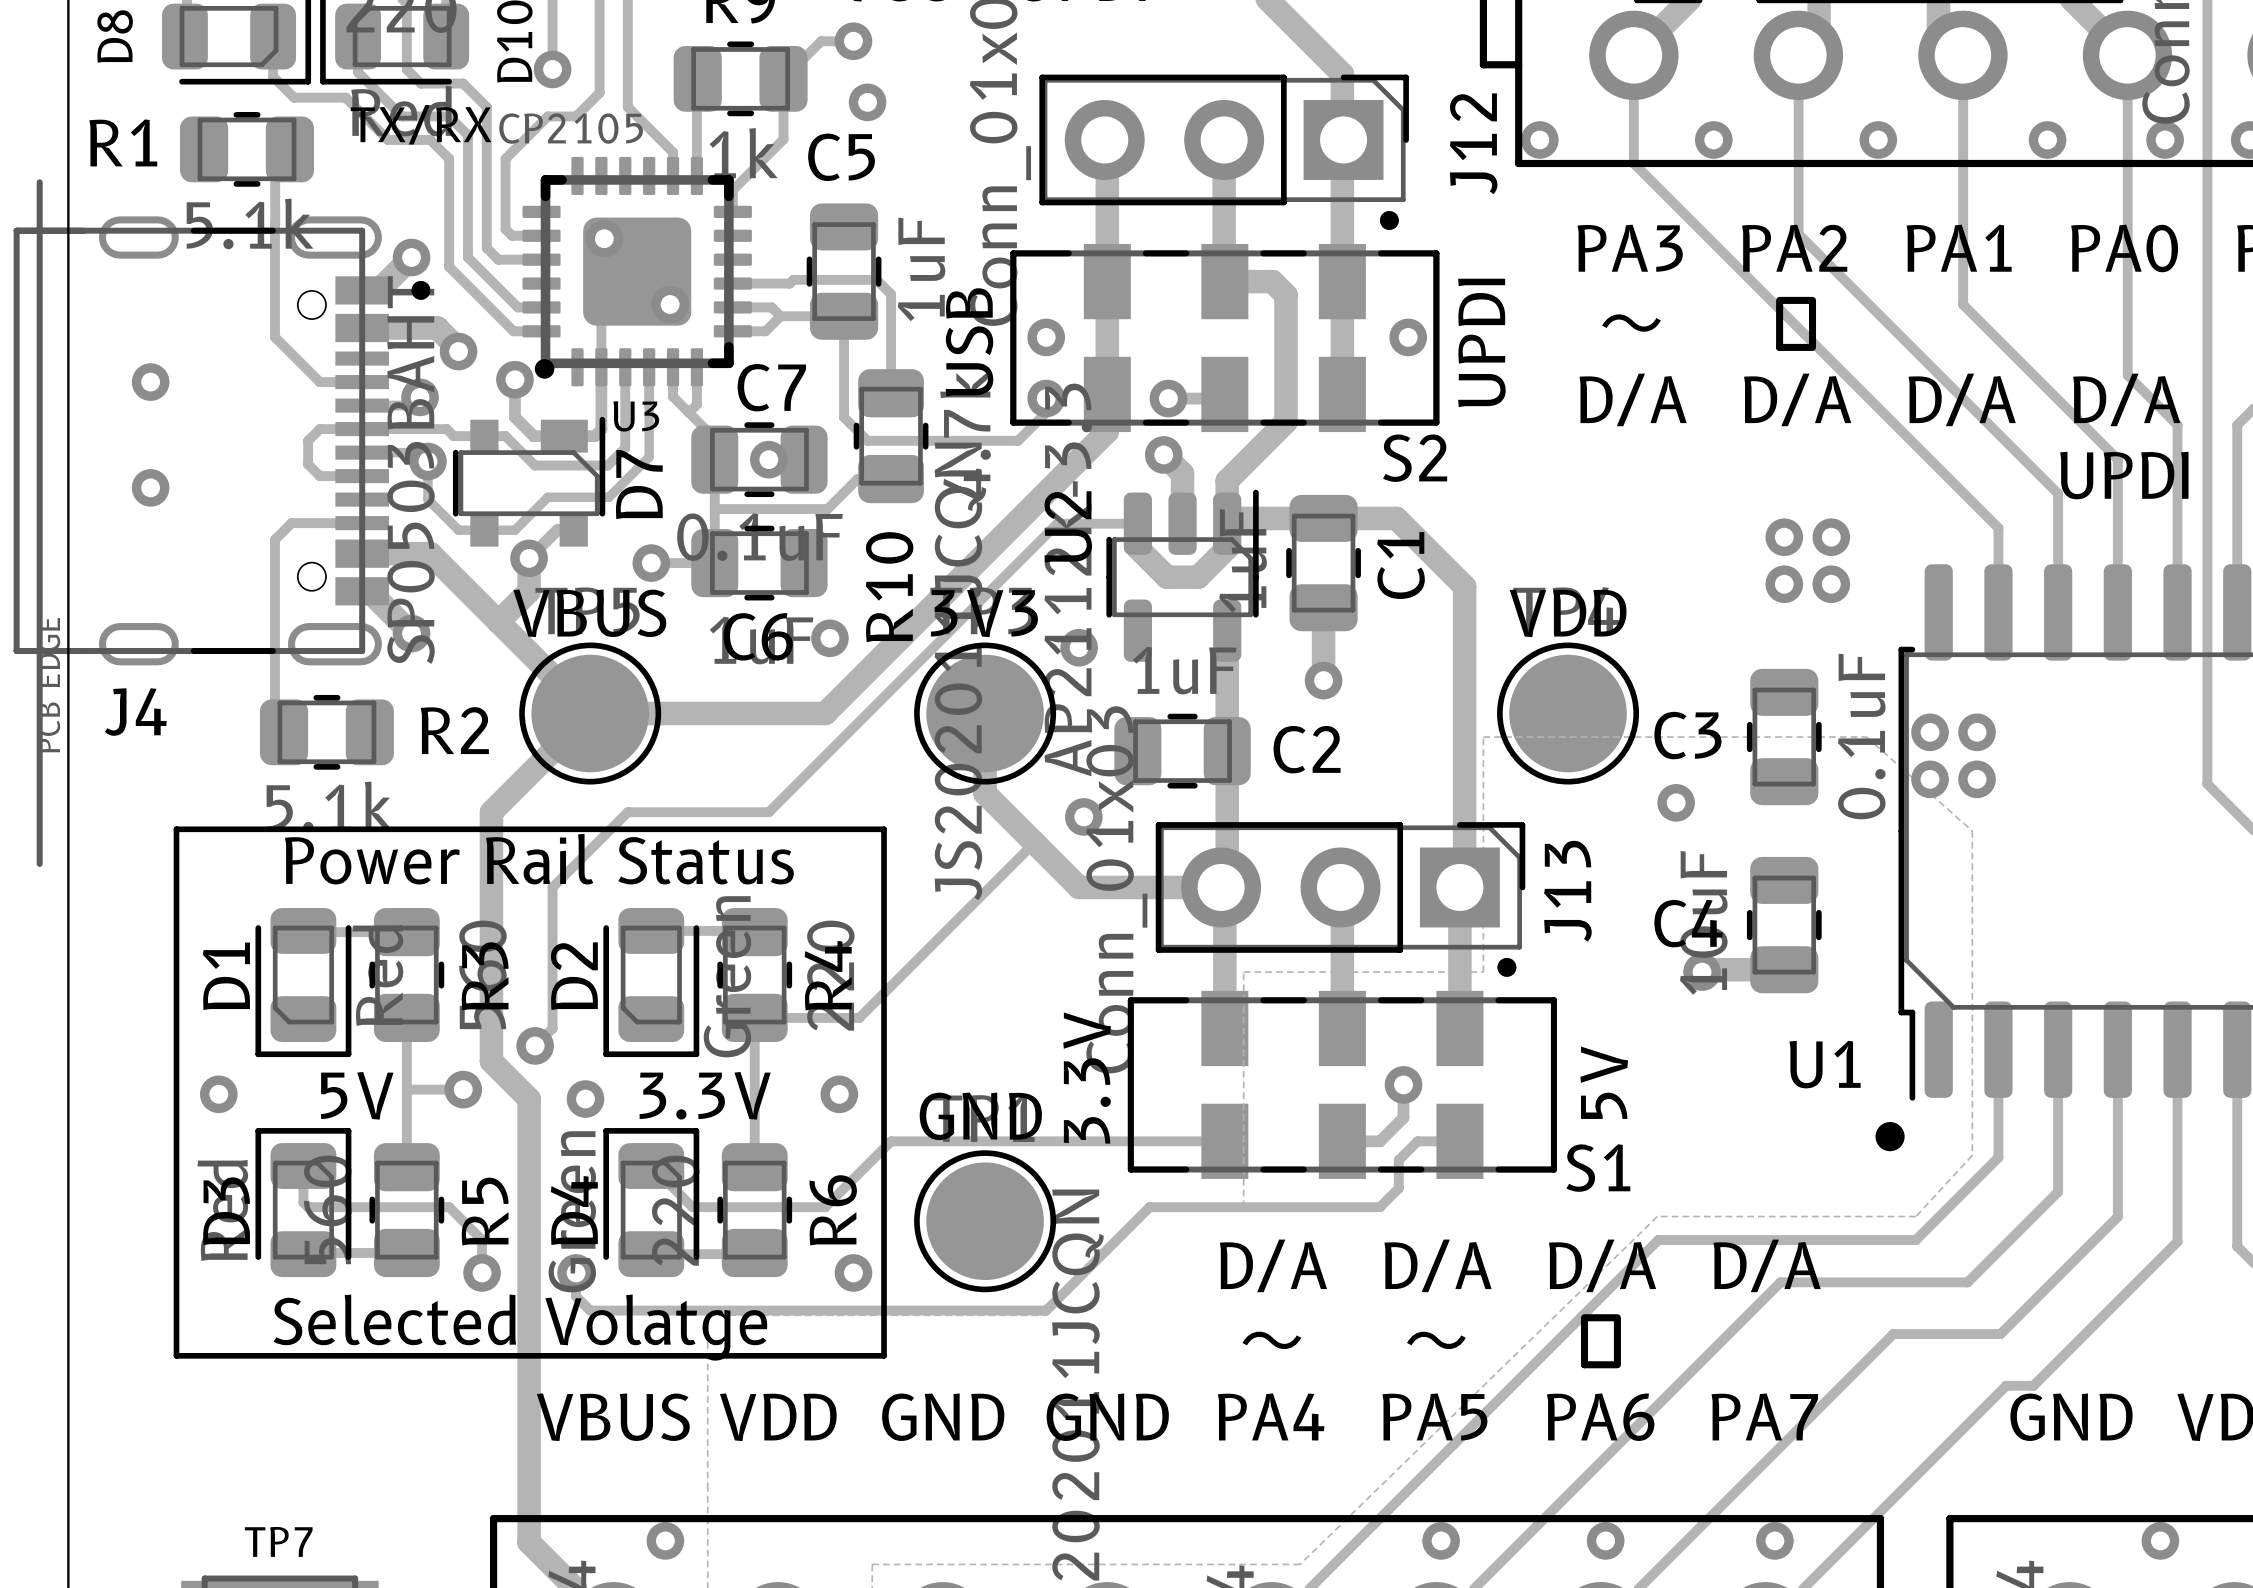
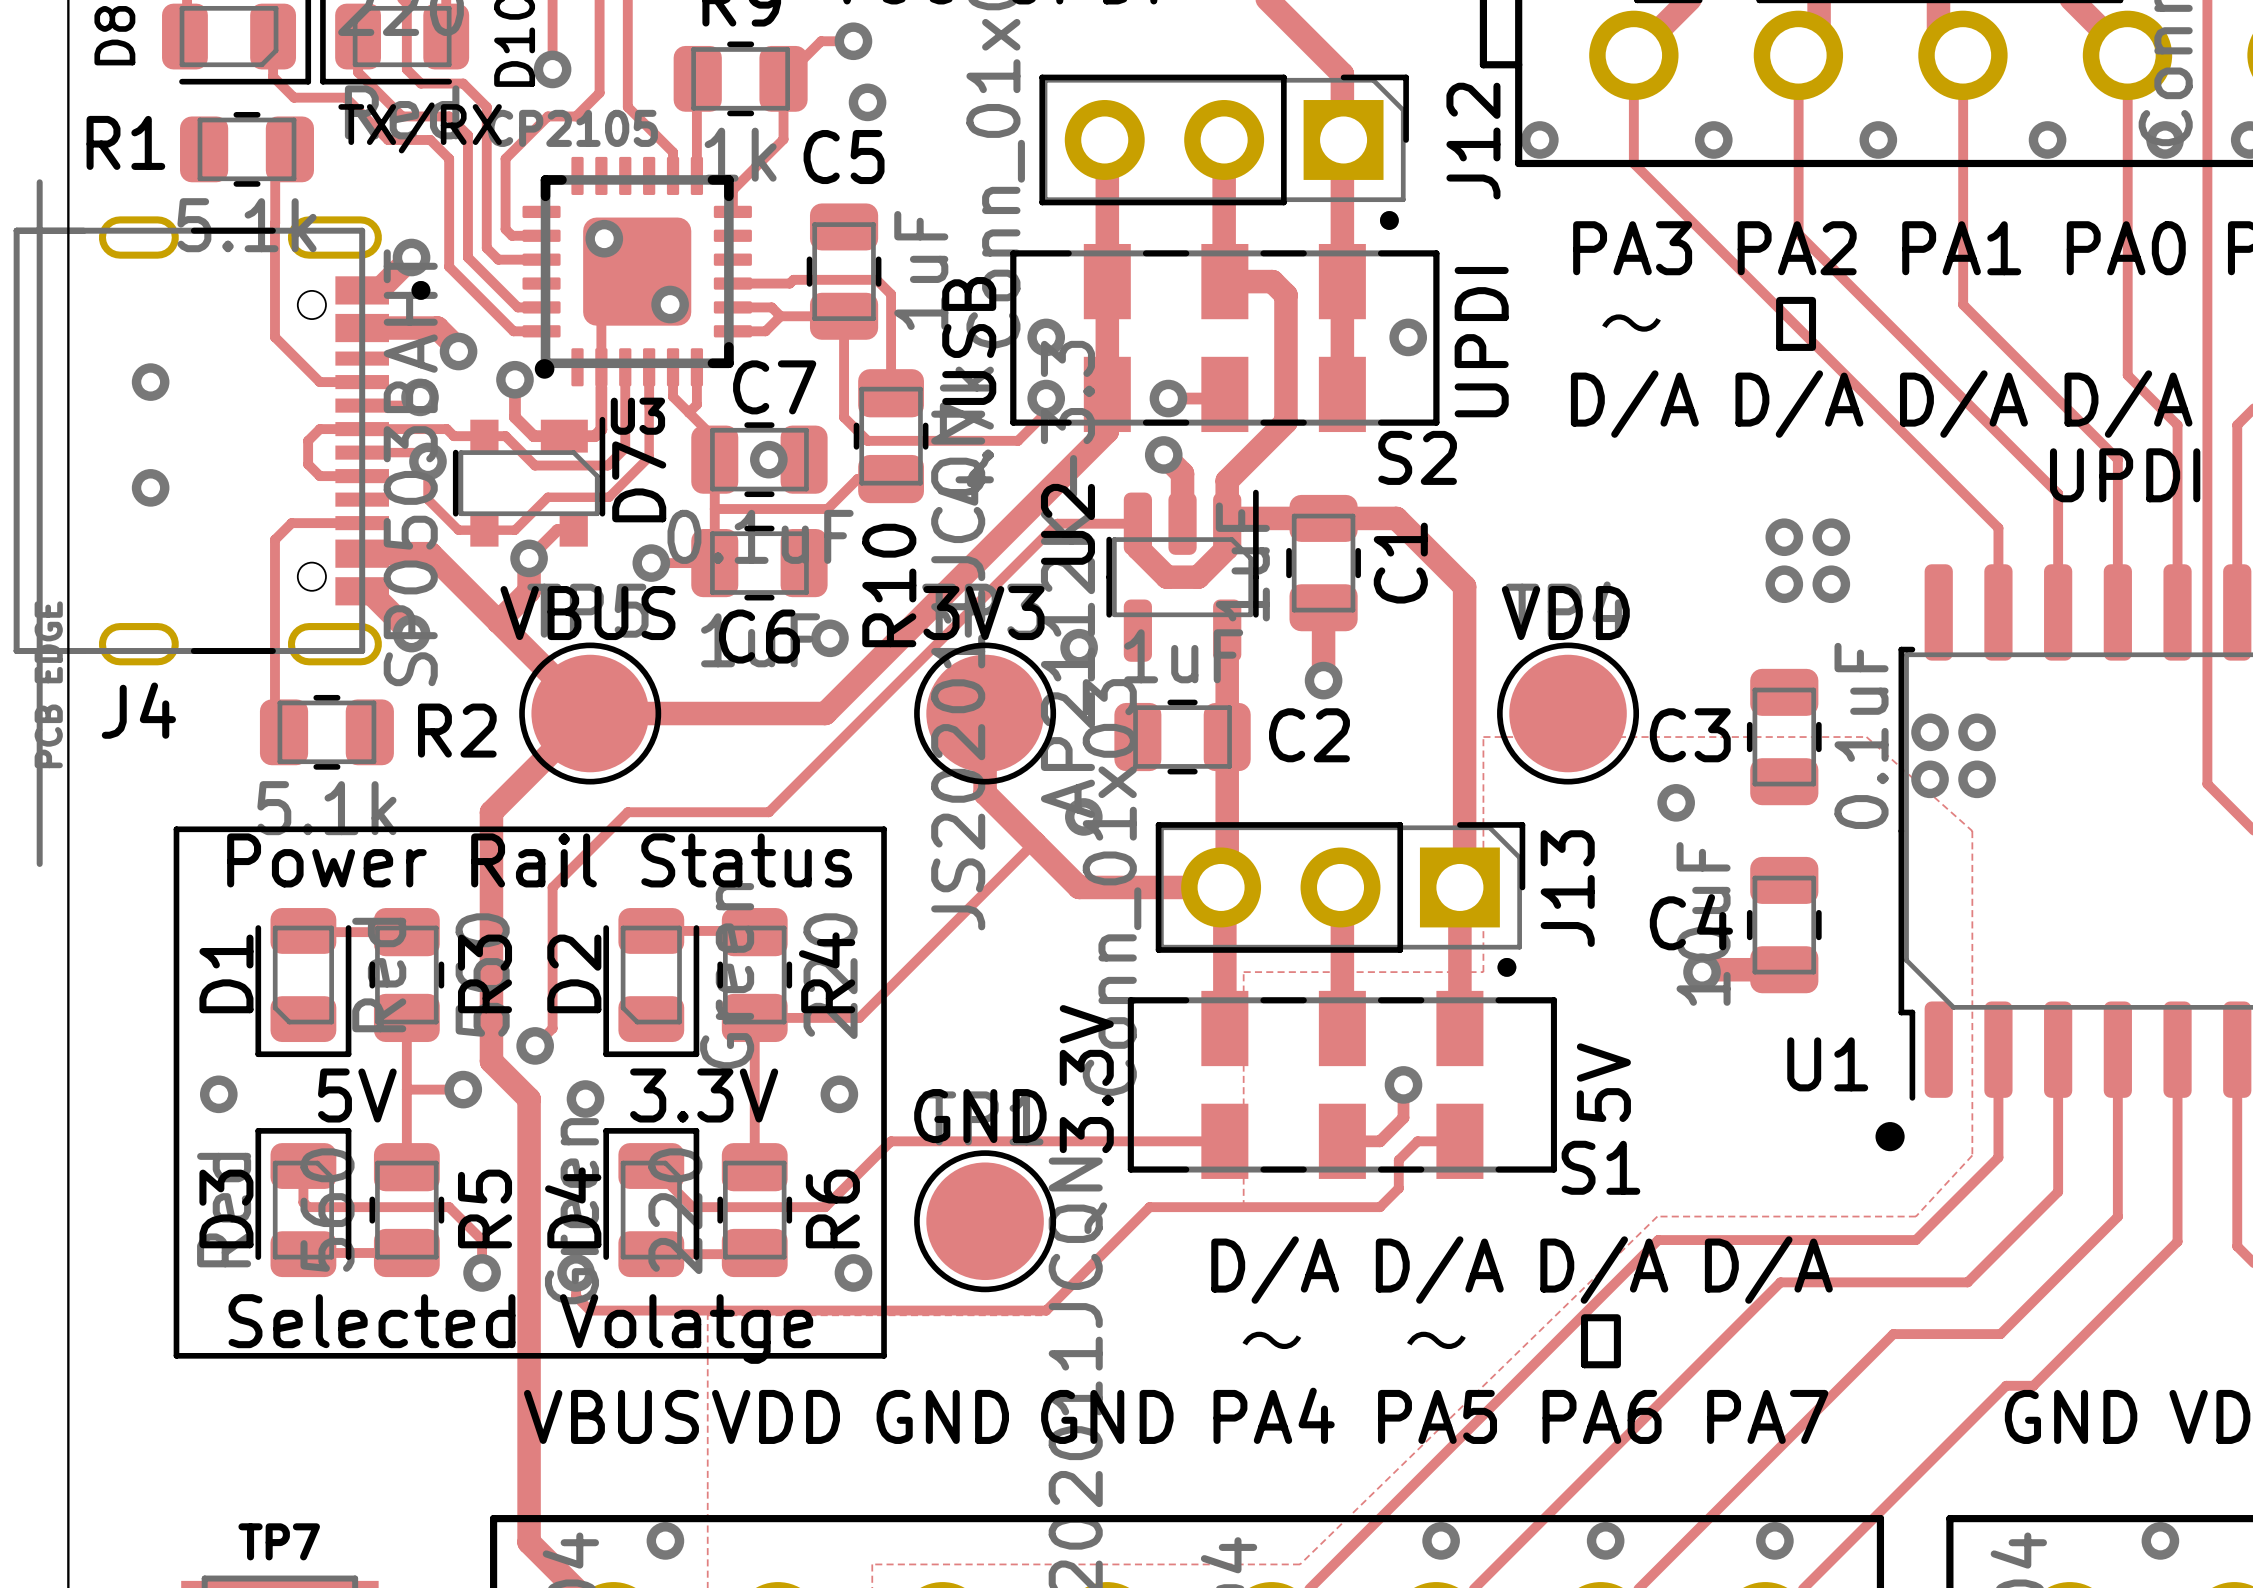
C2 position: (1182, 751) -> (1182, 737)

